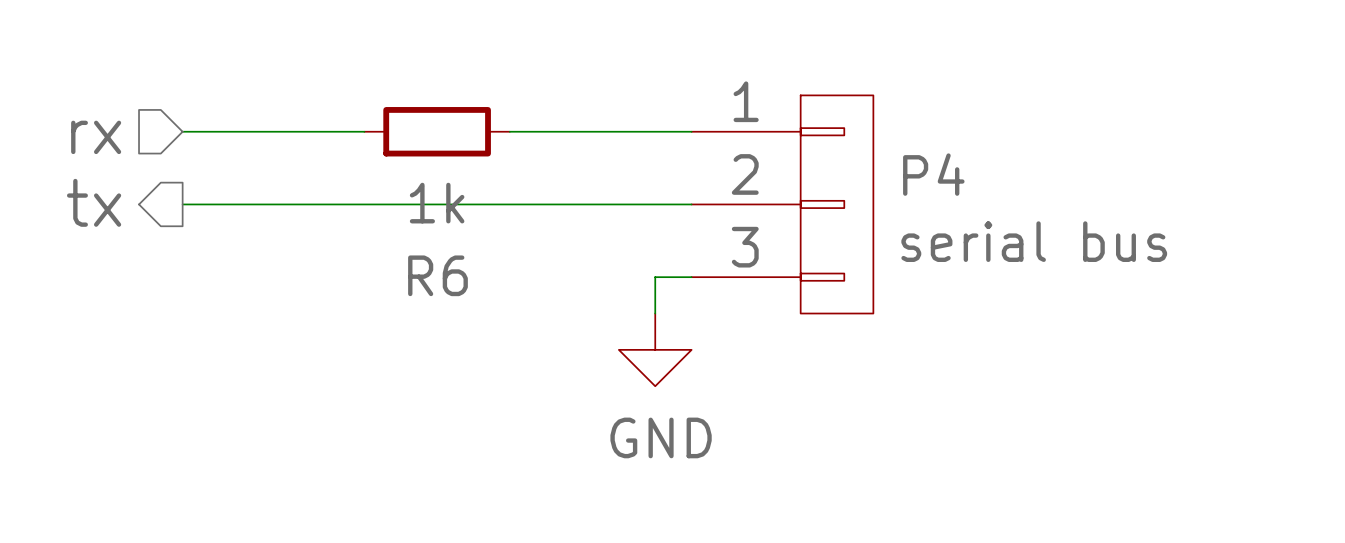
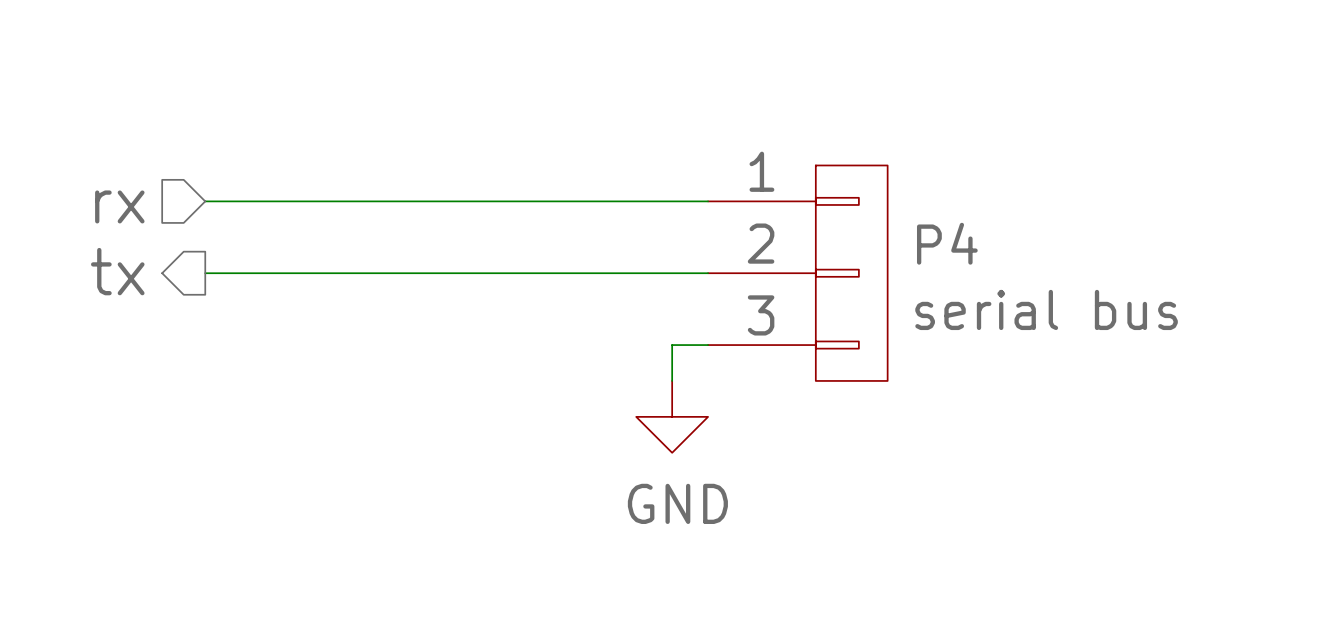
wire: none -> (384, 201) (528, 201)
R6: 1k (437, 131) -> none

